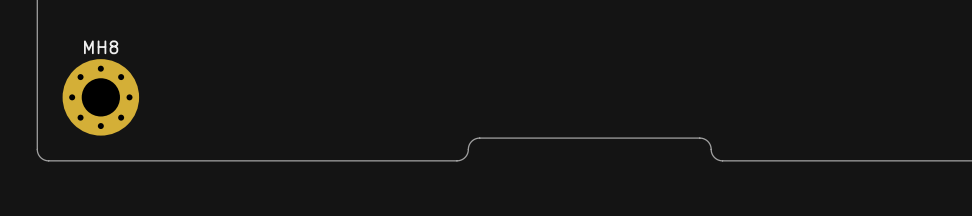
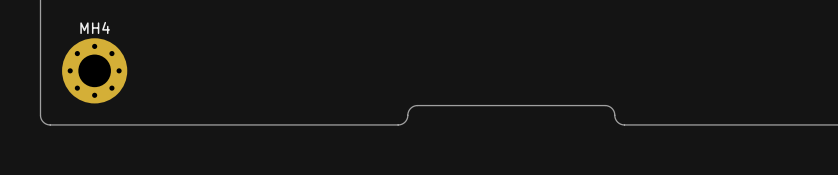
MH8 name: MH8 (101, 47) -> MH4 (95, 27)

